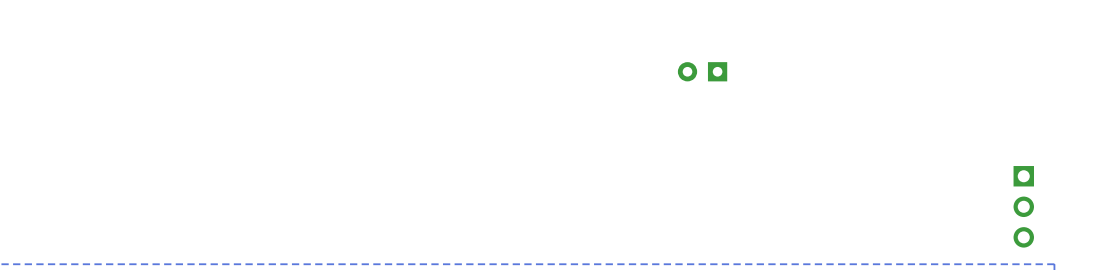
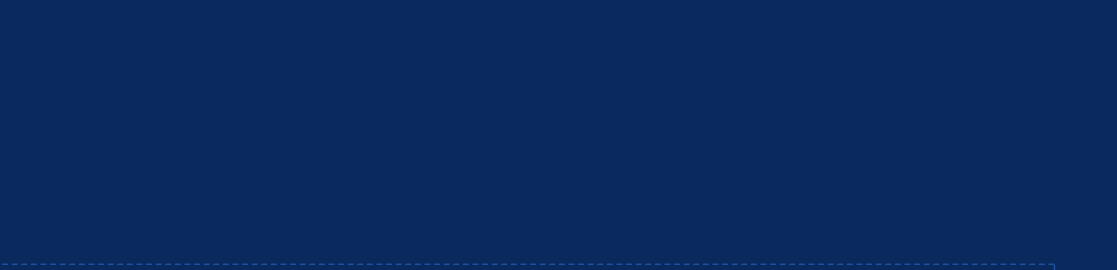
part: (702, 71) -> none
part: (1023, 206) -> none

